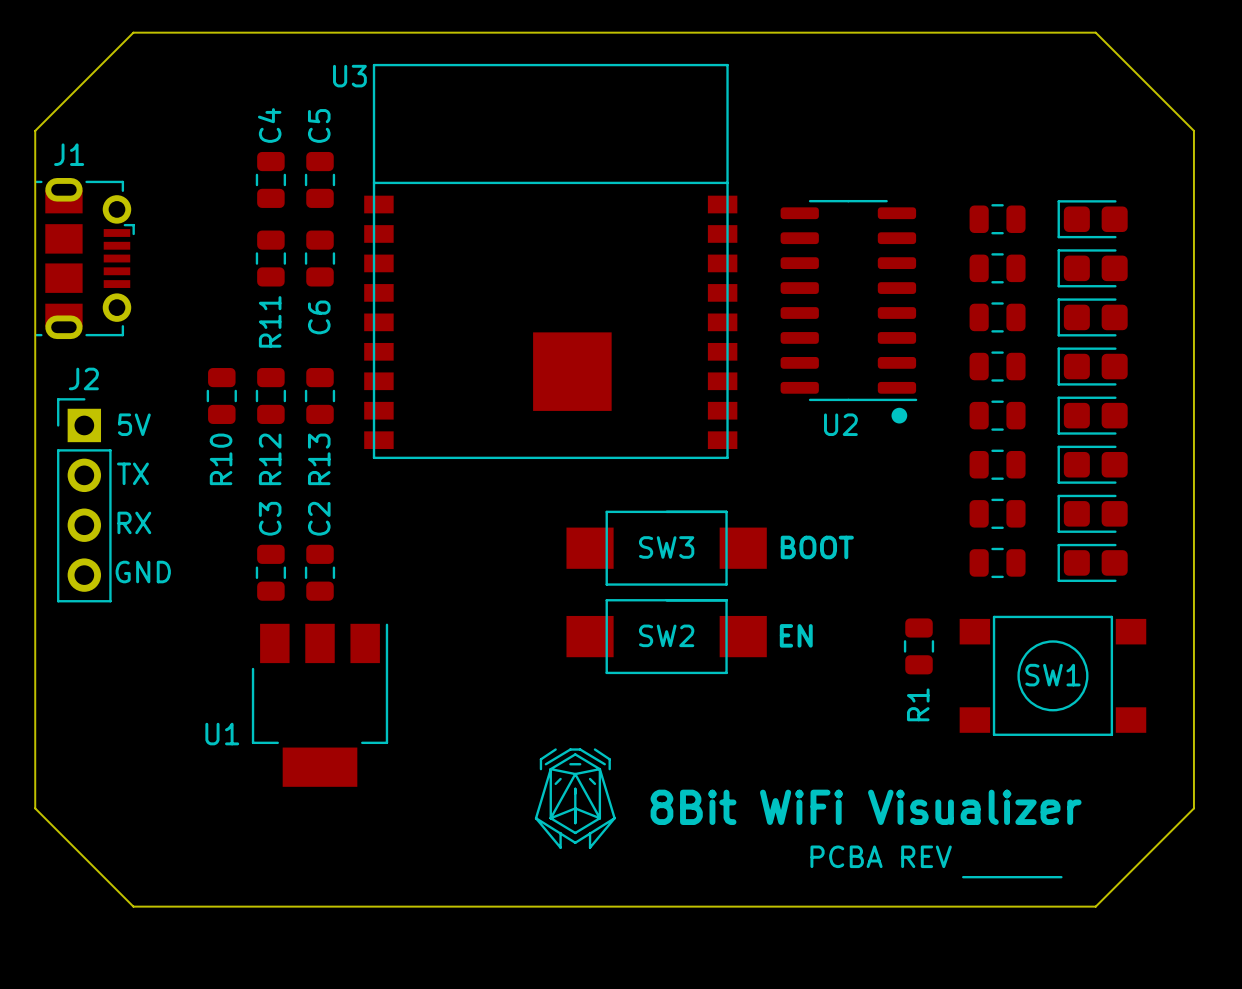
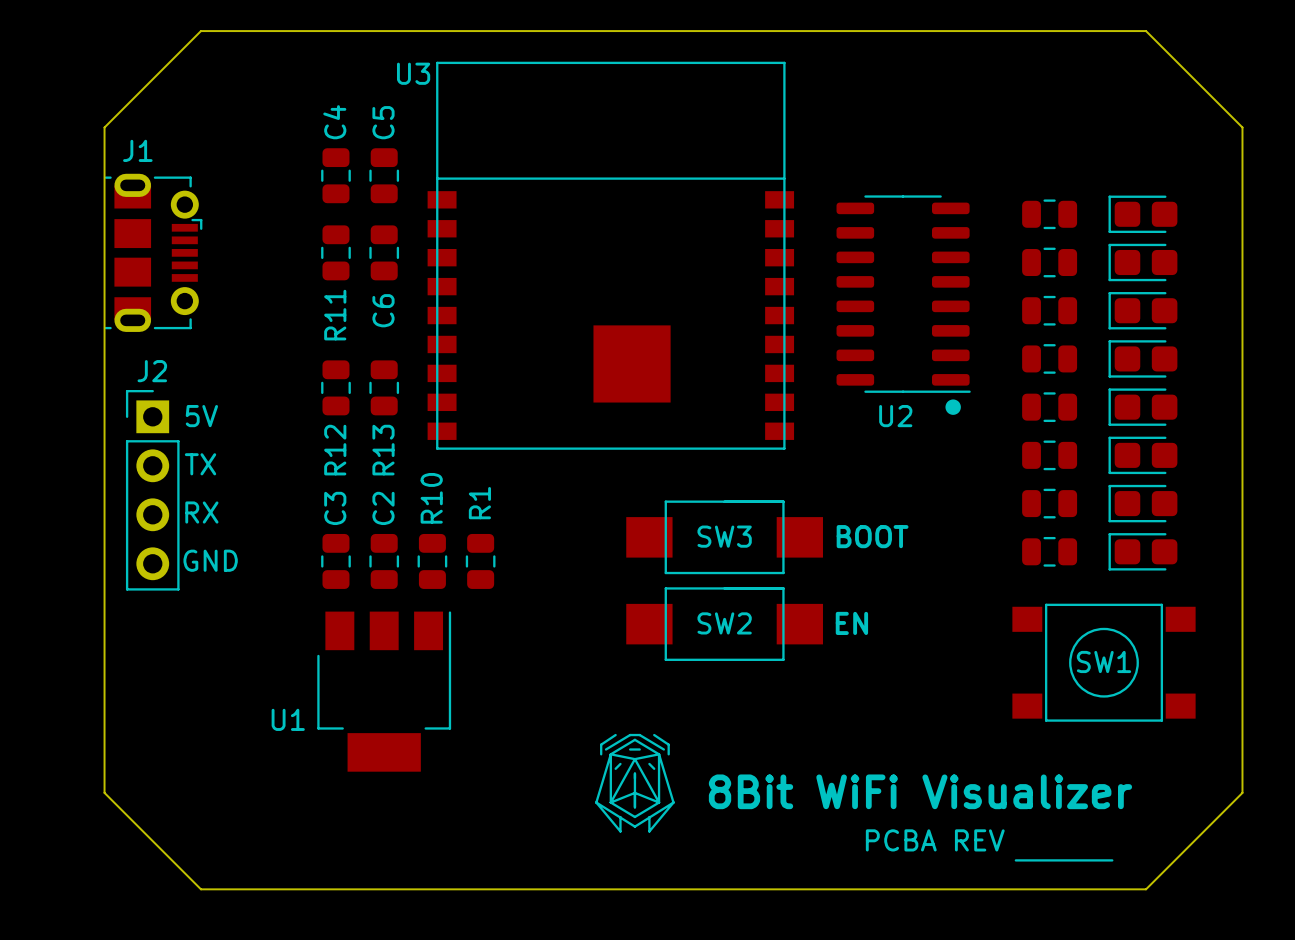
R10 position: (221, 396) -> (432, 561)
R10 name position: R10 (221, 459) -> R10 (431, 498)
R1 position: (919, 646) -> (480, 561)
R1 name position: R1 (918, 704) -> R1 (479, 503)

